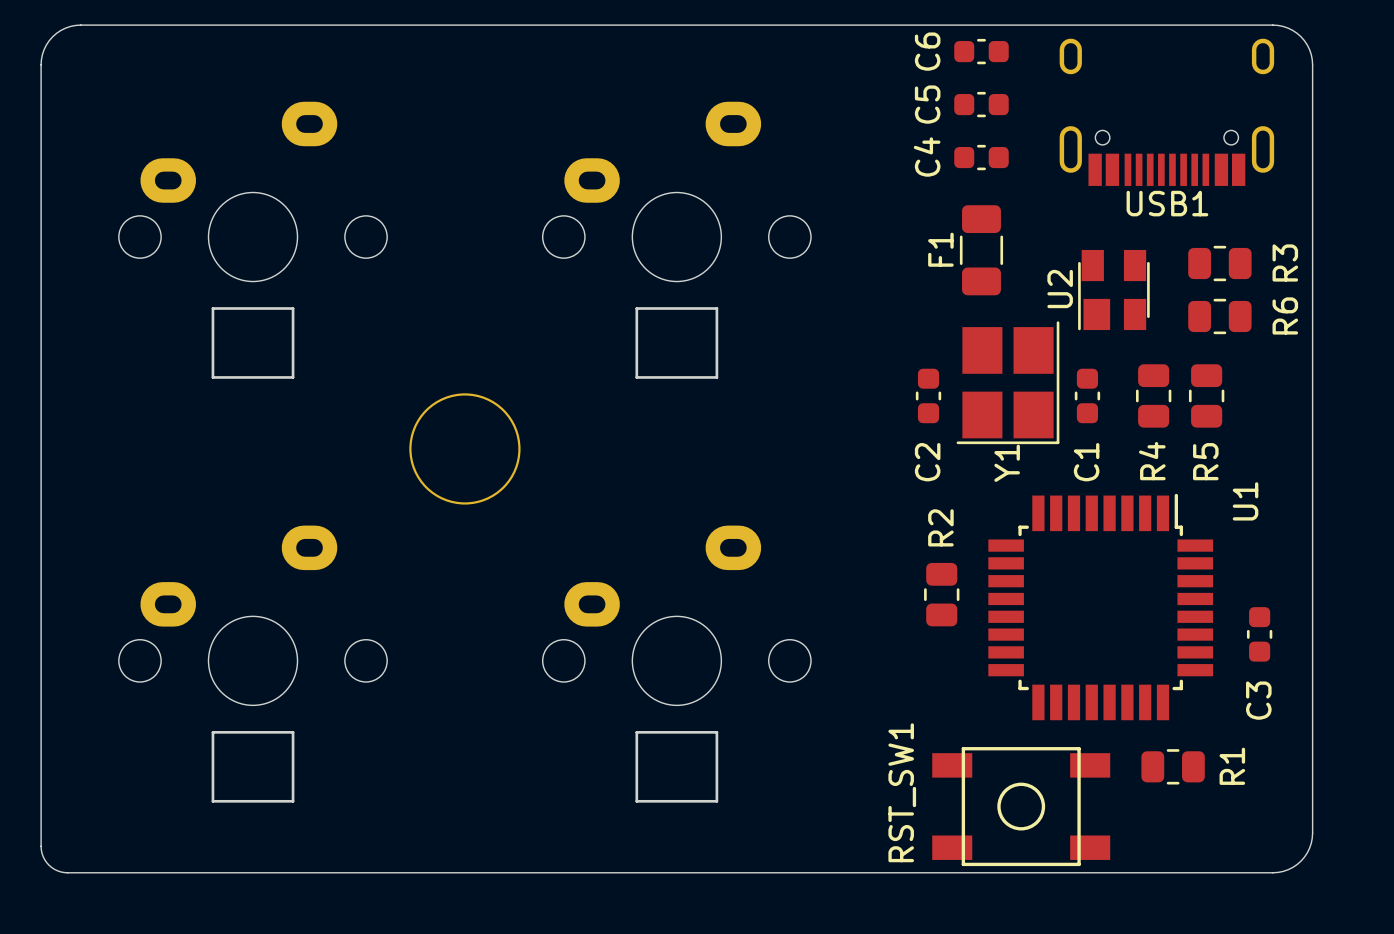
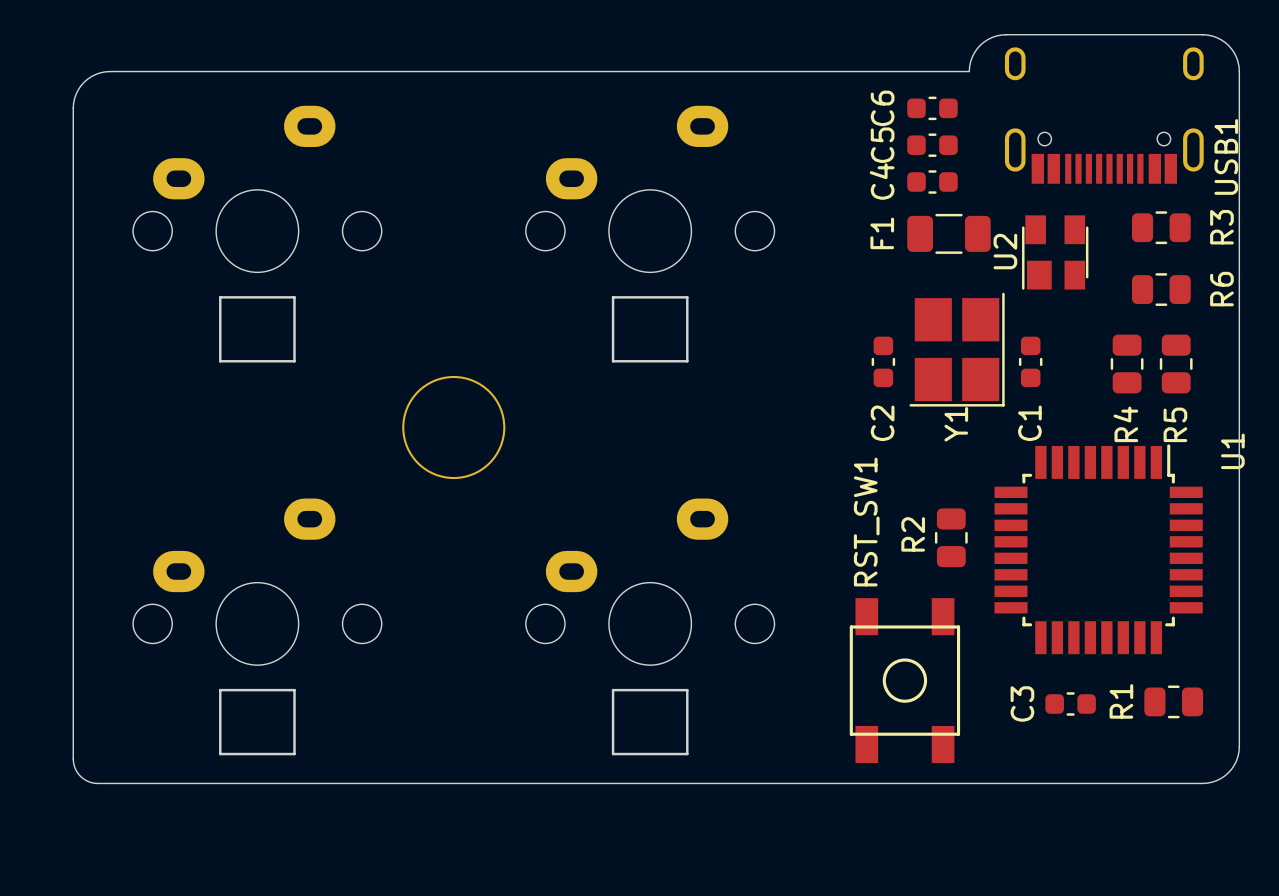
board edge: (1060, 25) (80, 25) (65, 28) (56, 33) (44, 49) (41, 64) (41, 853) (51, 867) (67, 872) (1272, 872) (1292, 867) (1307, 852) (1312, 838) (1312, 793) -> (1006, 34) (992, 37) (980, 45) (972, 57) (969, 71) (110, 71) (96, 74) (87, 79) (76, 94) (73, 108) (74, 765) (82, 778) (97, 783) (1202, 783) (1216, 780) (1228, 772) (1236, 760) (1239, 746)
C6: (981, 51) -> none
C5 name: C5 (927, 104) -> C6 (882, 108)
C5: none -> (932, 145)
C4 position: (981, 157) -> (932, 182)
USB1 name rotation: 0° (1167, 203) -> 90° counterclockwise (1226, 156)
USB1 name position: USB1 (1167, 203) -> USB1 (1226, 156)
F1 rotation: 0° (981, 250) -> 90° clockwise (948, 233)
R3 position: (1219, 263) -> (1161, 227)
U2 position: (1113, 290) -> (1055, 252)
R6 position: (1219, 316) -> (1161, 289)
Y1 position: (1007, 382) -> (957, 349)
C2 position: (928, 395) -> (883, 361)
C1 position: (1087, 395) -> (1030, 361)
R4 position: (1153, 395) -> (1127, 363)
R5 position: (1206, 395) -> (1176, 363)
R2 name position: R2 (940, 527) -> R2 (913, 534)
R2 position: (941, 594) -> (951, 537)
U1 position: (1100, 607) -> (1098, 549)
C3 rotation: 0° (1259, 634) -> 90° clockwise (1070, 703)
C3 position: (1259, 634) -> (1070, 703)
R1 position: (1173, 766) -> (1173, 701)
R1 name position: R1 (1232, 766) -> R1 (1121, 701)
RST_SW1 name position: RST_SW1 (902, 792) -> RST_SW1 (866, 522)
RST_SW1 rotation: 0° (1021, 806) -> 90° clockwise (904, 680)
RST_SW1 position: (1021, 806) -> (904, 680)

